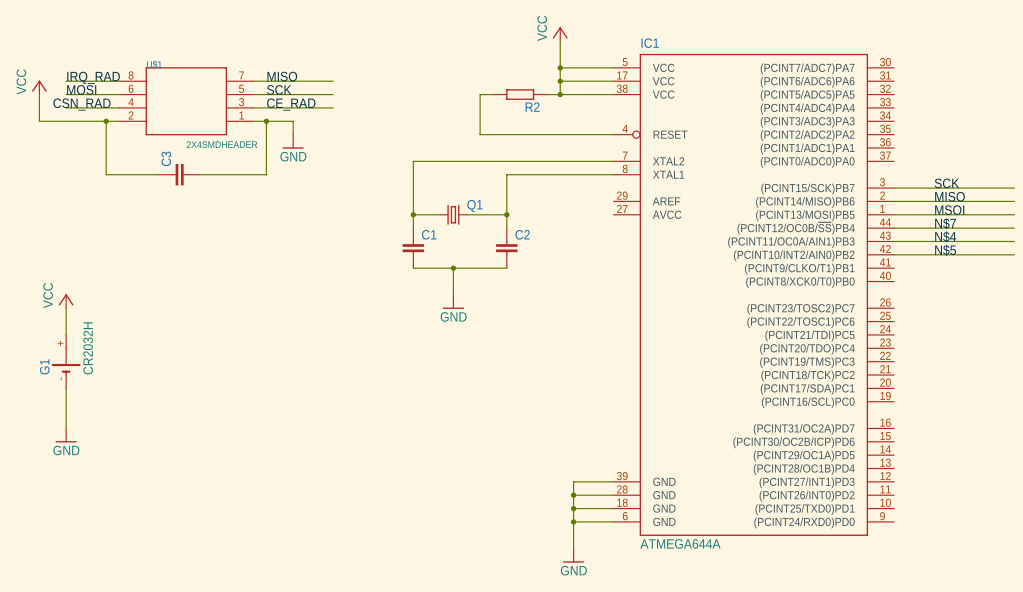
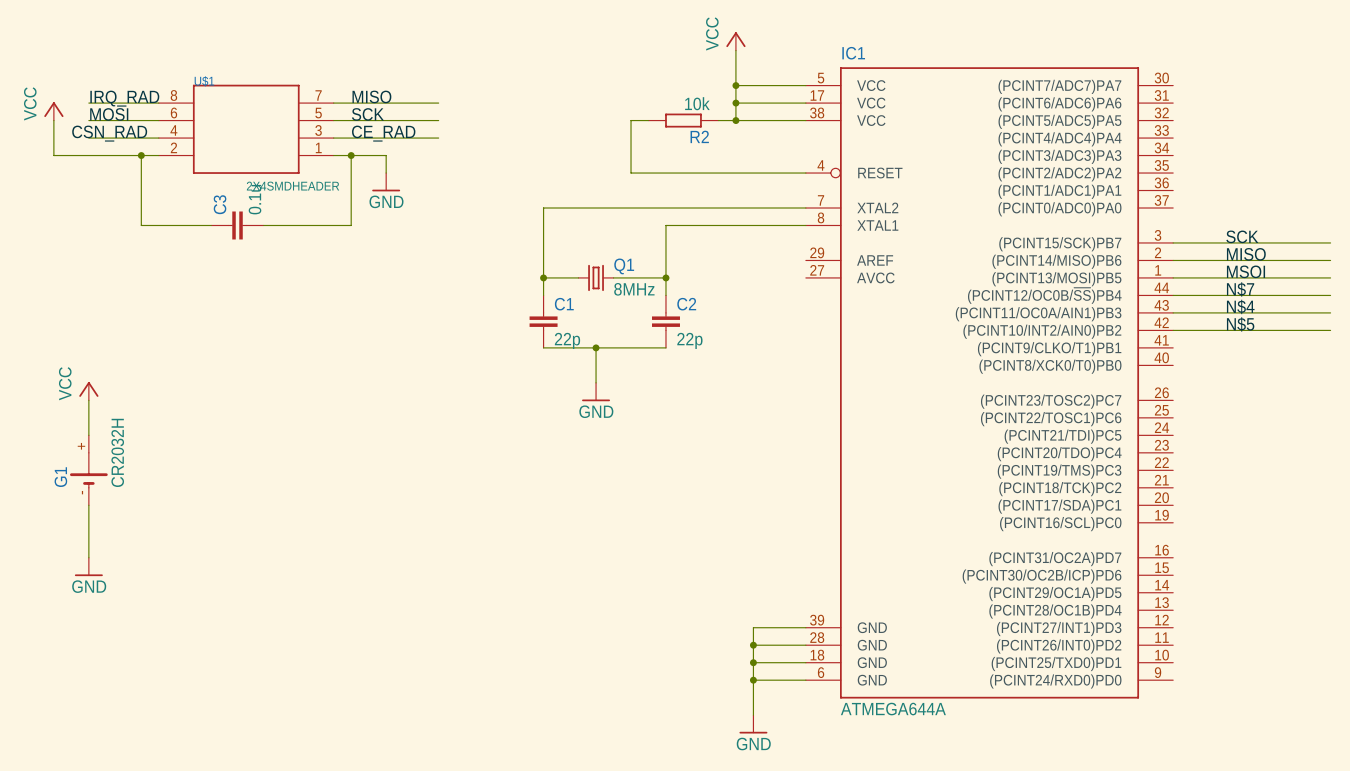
R2 value: none -> 10k (697, 103)
C3 value: none -> 0.1u (255, 199)
Q1 value: none -> 8MHz (634, 289)
C1 value: none -> 22p (567, 340)
C2 value: none -> 22p (689, 340)

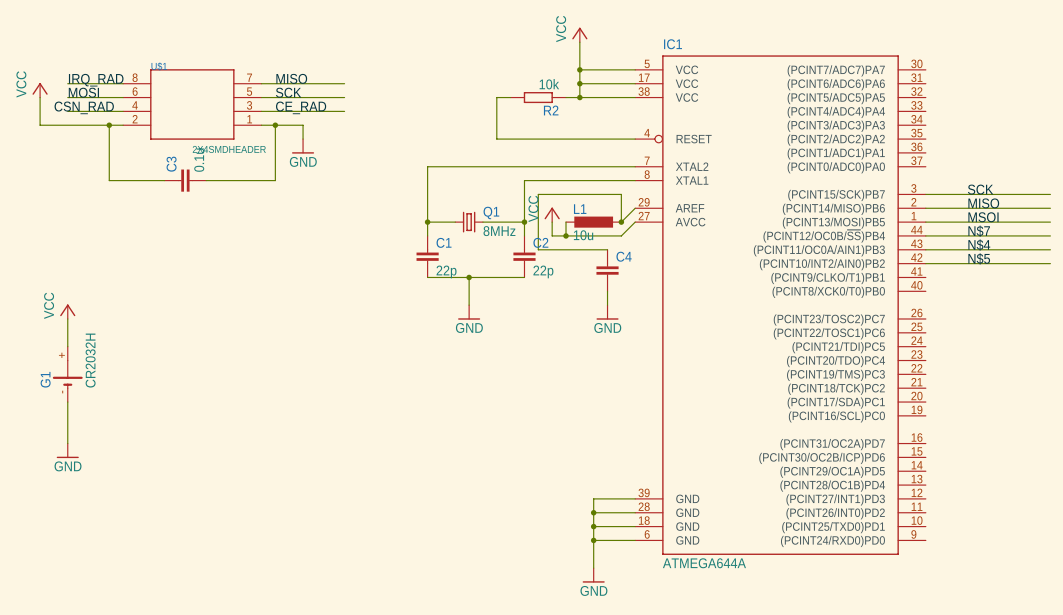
wire: none -> (635, 208) (621, 222) (621, 194) (538, 194) (538, 249) (607, 249)
power symbol: none -> VCC (552, 214)
wire: none -> (552, 222) (552, 235) (621, 235) (635, 222)
wire: none -> (566, 222) (566, 235)
L1: none -> 10u (593, 222)
junction: none -> (621, 222)
junction: none -> (566, 235)
C4: none -> (607, 270)
wire: none -> (607, 291) (607, 305)
power symbol: none -> GND (607, 312)

